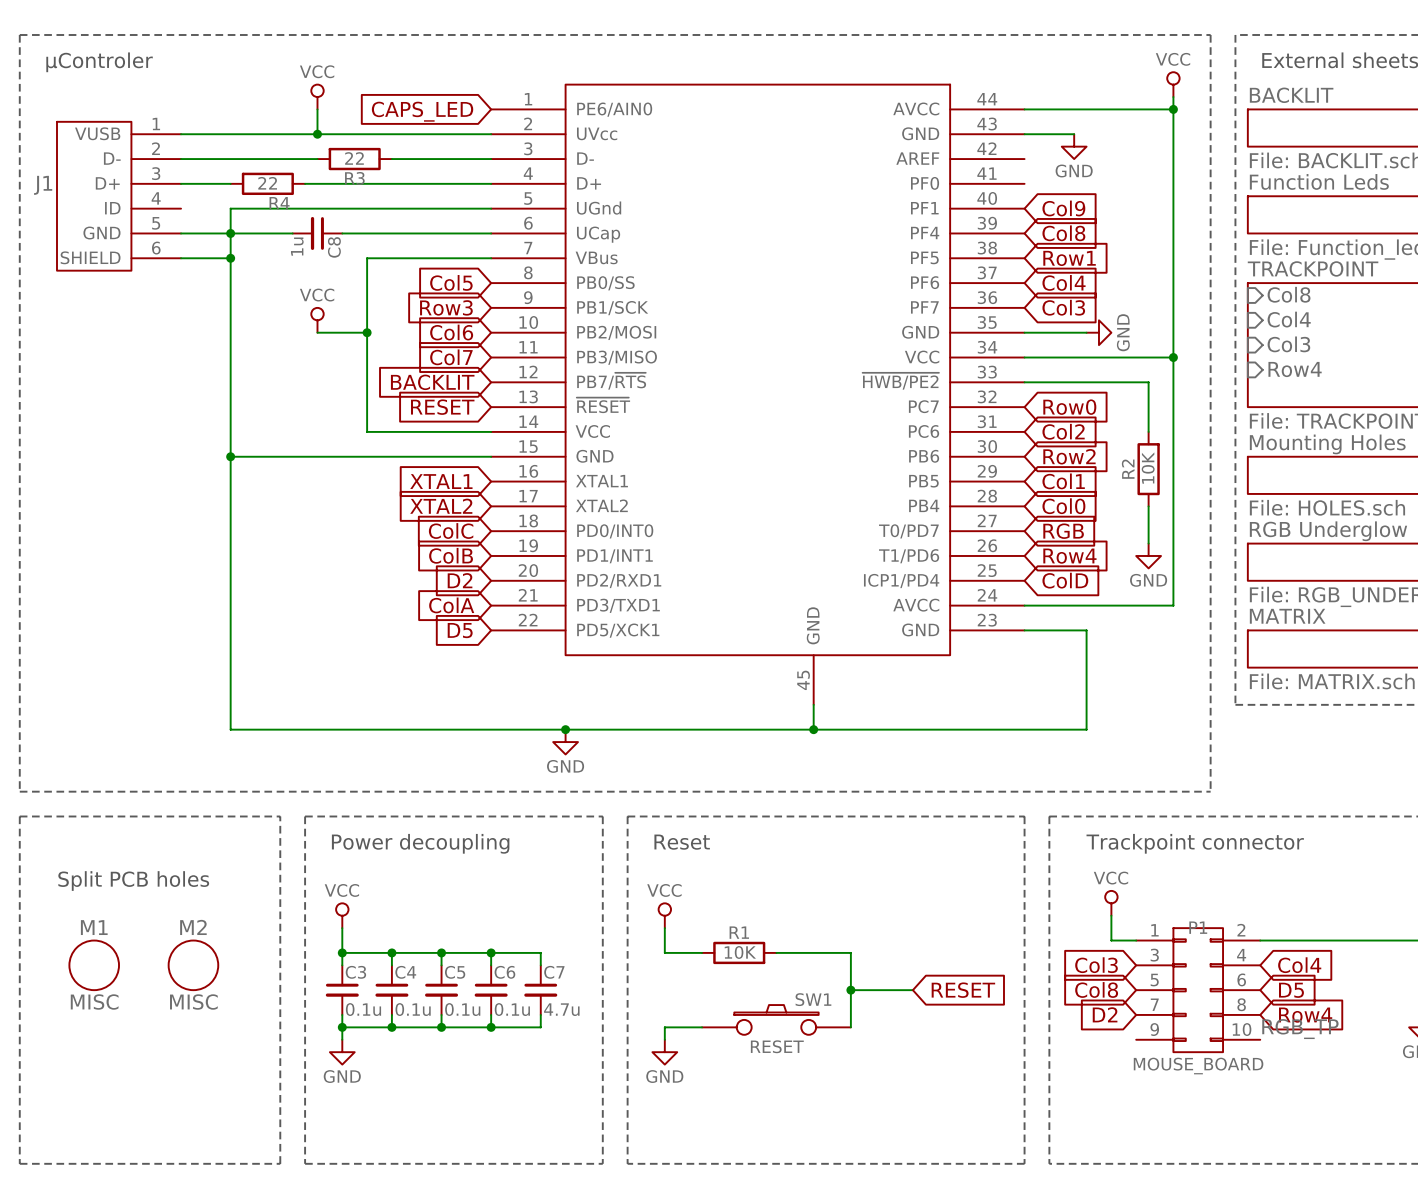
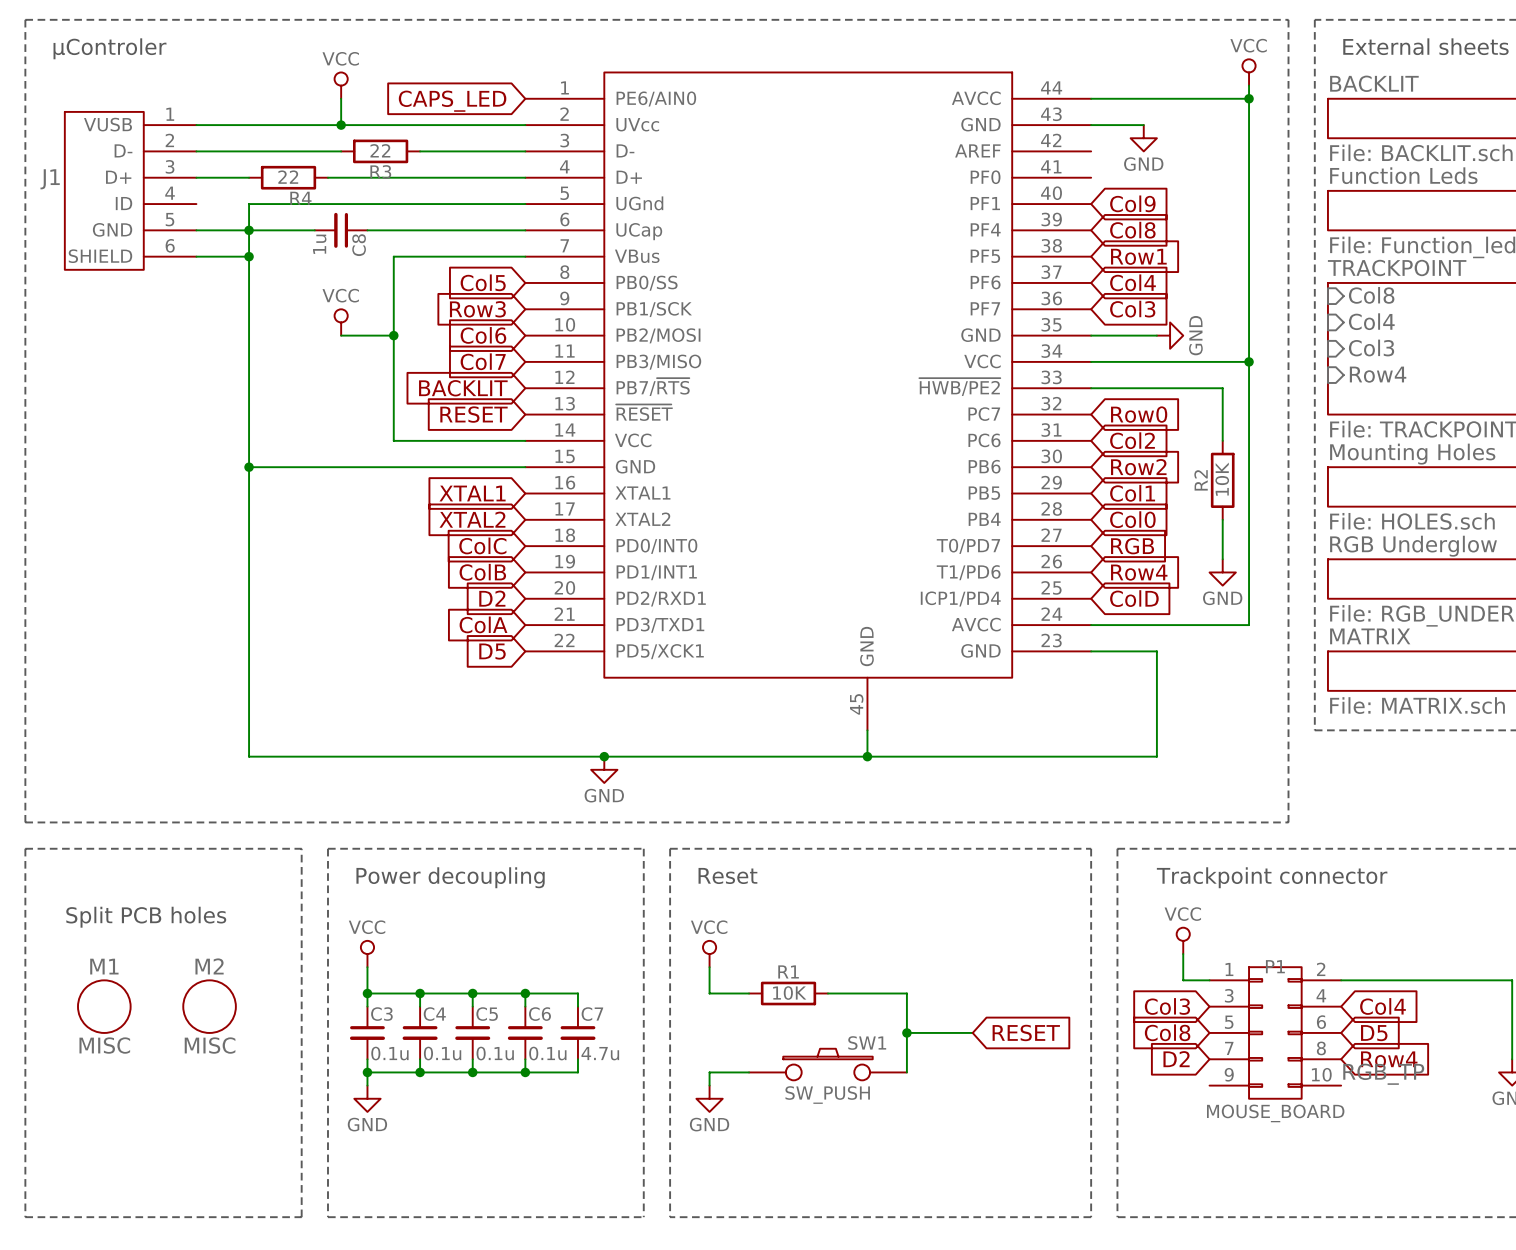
SW1 value: RESET (777, 1046) -> SW_PUSH (827, 1095)

